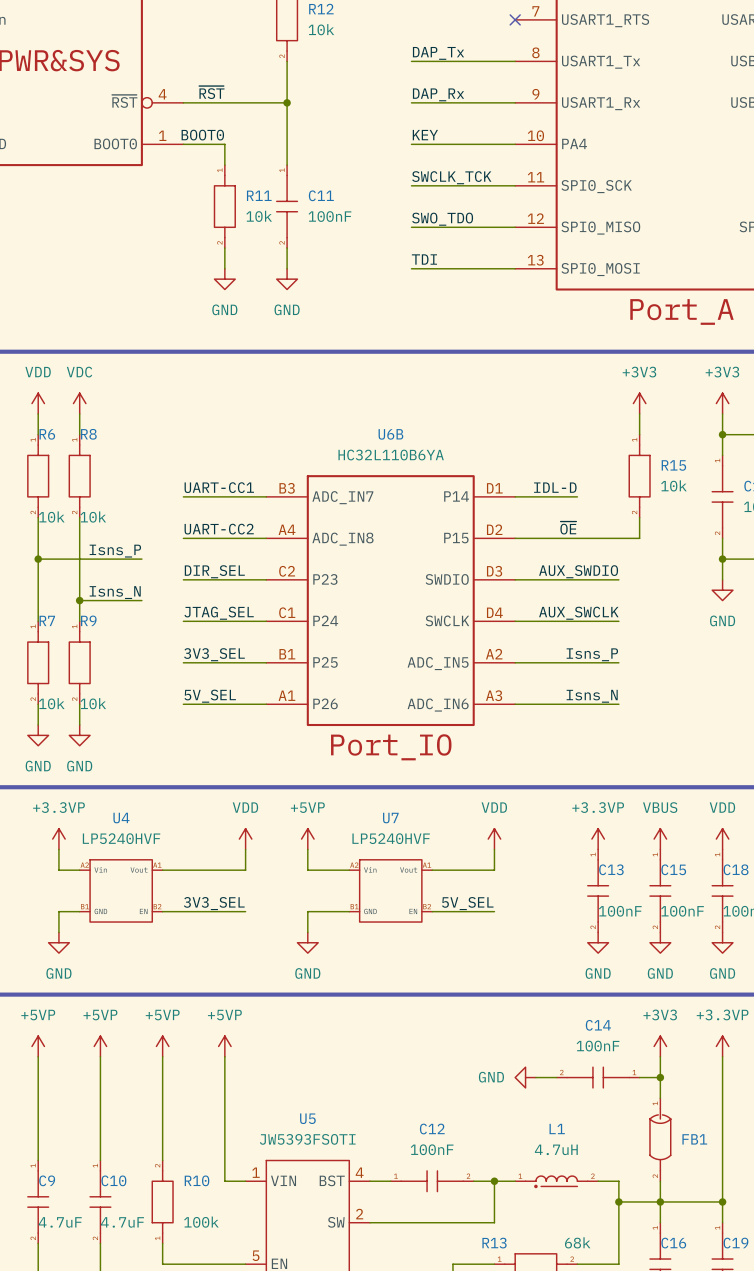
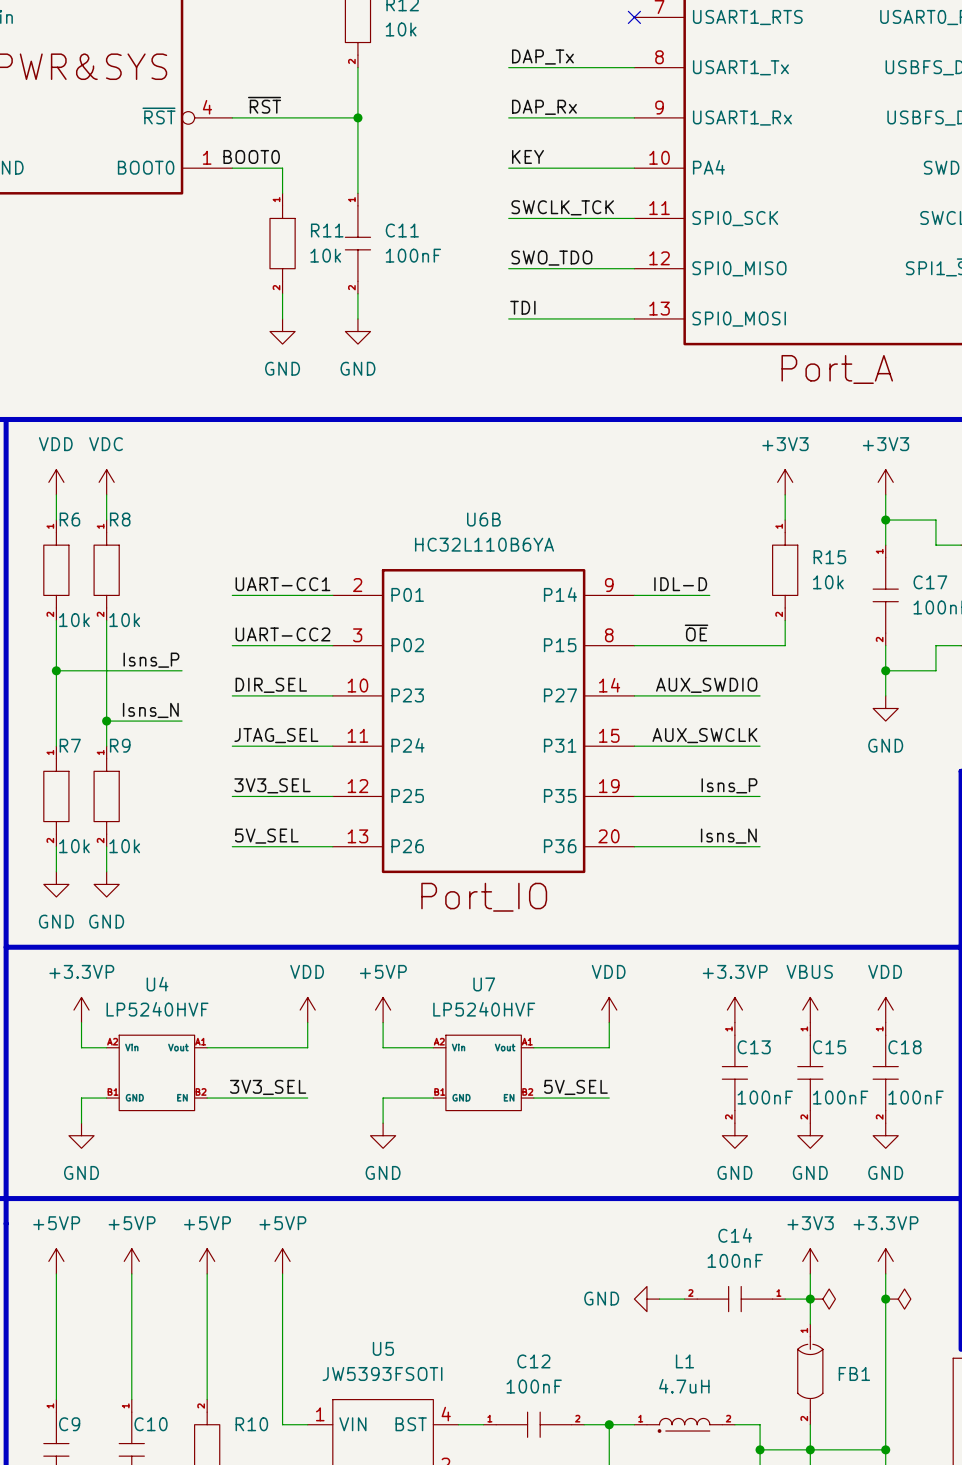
U6B symbol: [266, 475, 516, 727] -> [332, 569, 635, 874]
power symbol: none -> (822, 1299)
junction: none -> (885, 1299)
power symbol: none -> (898, 1299)

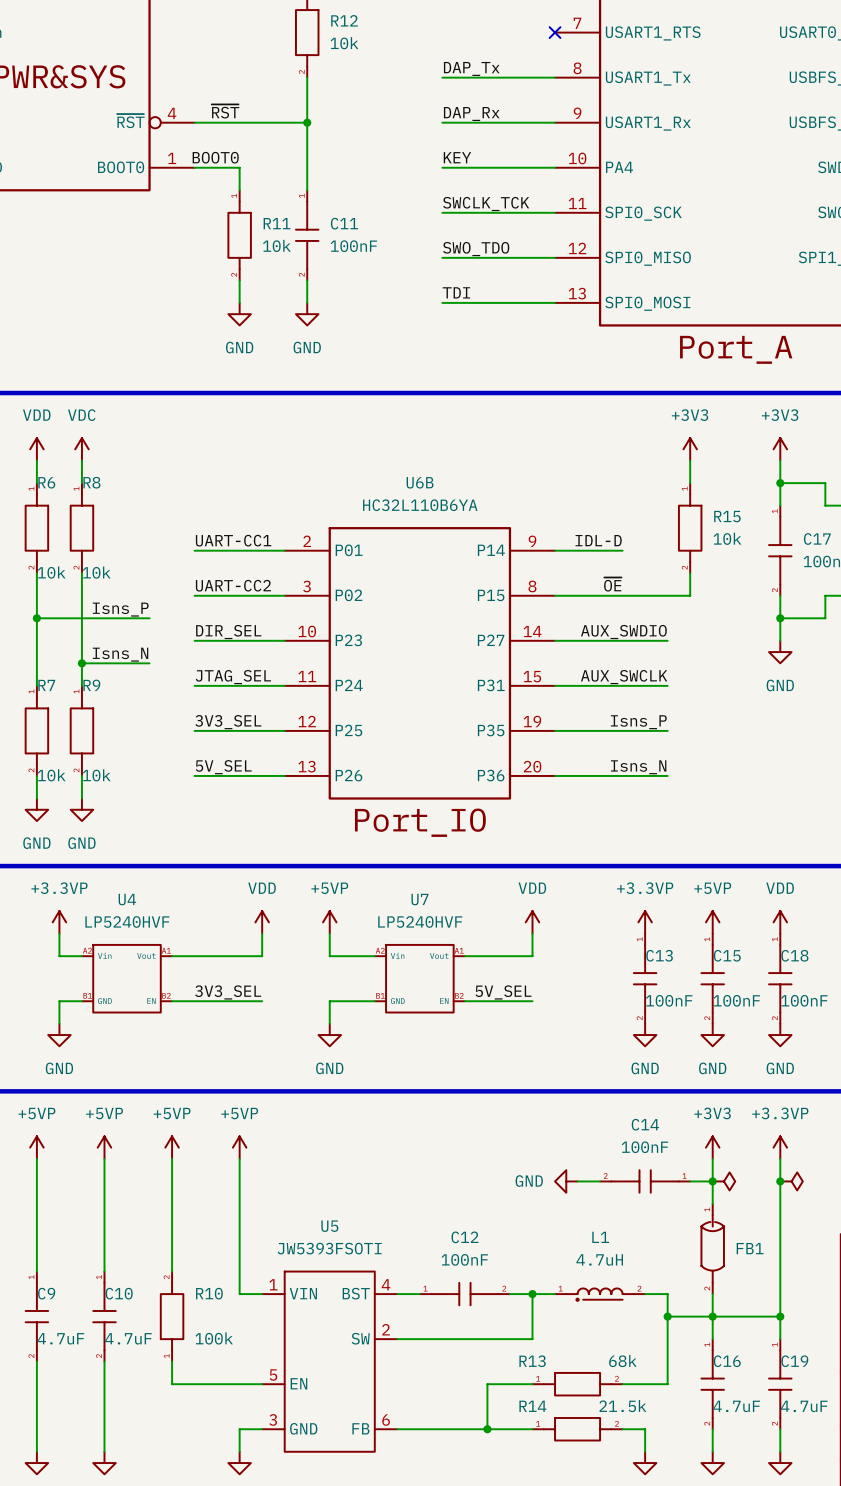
power symbol: VBUS (810, 1010) -> +5VP (712, 922)

